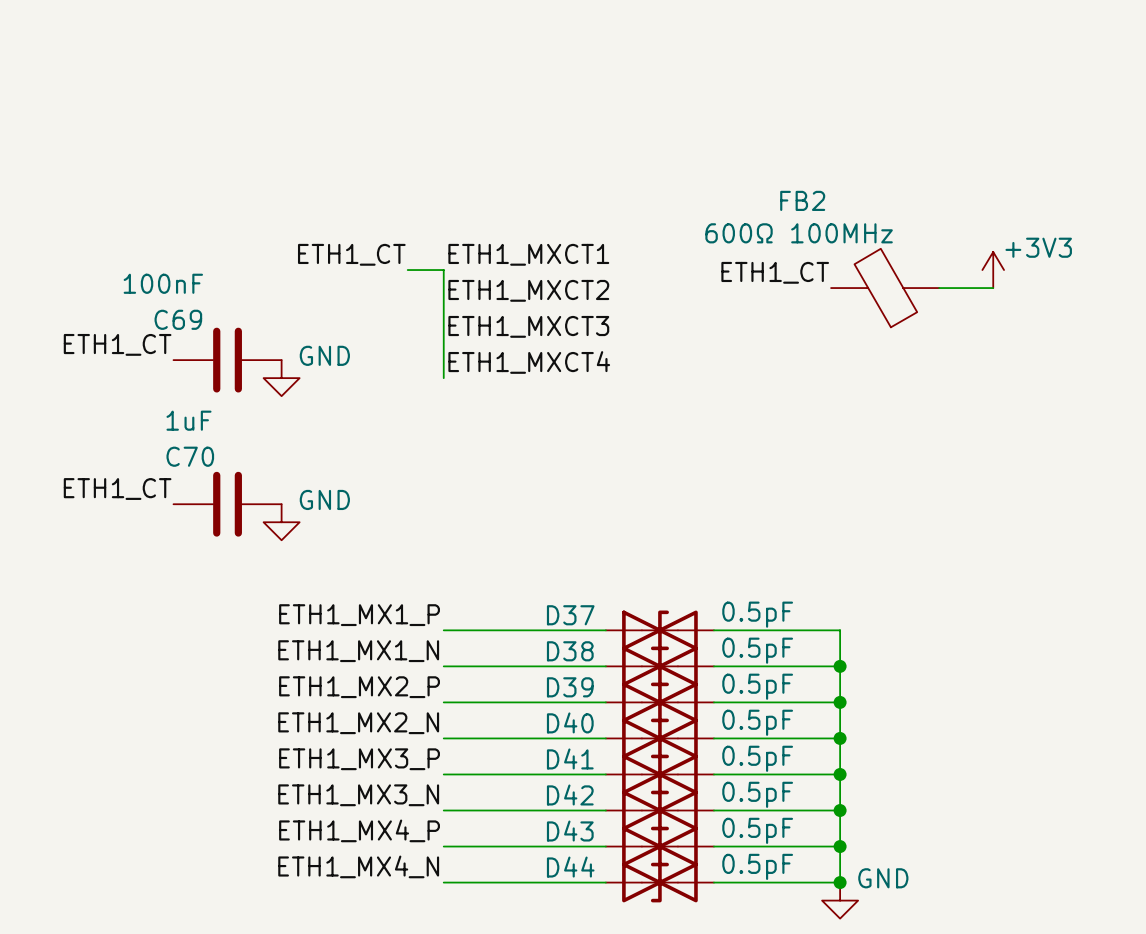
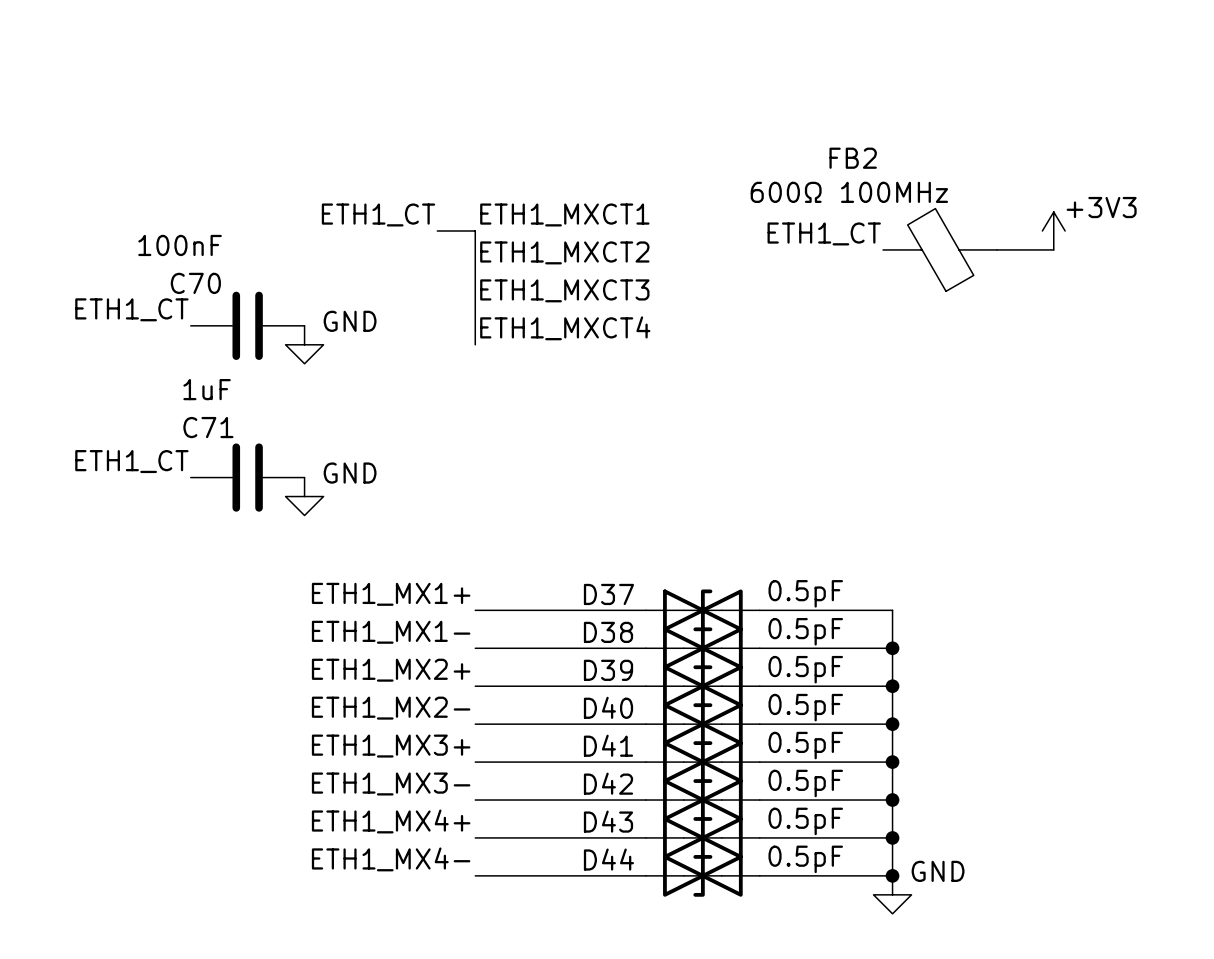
C69 name: C69 (178, 319) -> C70 (195, 283)
C70 name: C70 (190, 456) -> C71 (208, 427)
label: ETH1_MX1_P (359, 615) -> ETH1_MX1+ (391, 594)
label: ETH1_MX1_N (358, 651) -> ETH1_MX1- (391, 632)
label: ETH1_MX2_P (359, 687) -> ETH1_MX2+ (391, 670)
label: ETH1_MX2_N (358, 723) -> ETH1_MX2- (391, 708)
label: ETH1_MX3_P (359, 759) -> ETH1_MX3+ (391, 746)
label: ETH1_MX3_N (358, 795) -> ETH1_MX3- (391, 783)
label: ETH1_MX4_P (359, 830) -> ETH1_MX4+ (391, 821)
label: ETH1_MX4_N (358, 866) -> ETH1_MX4- (391, 859)

